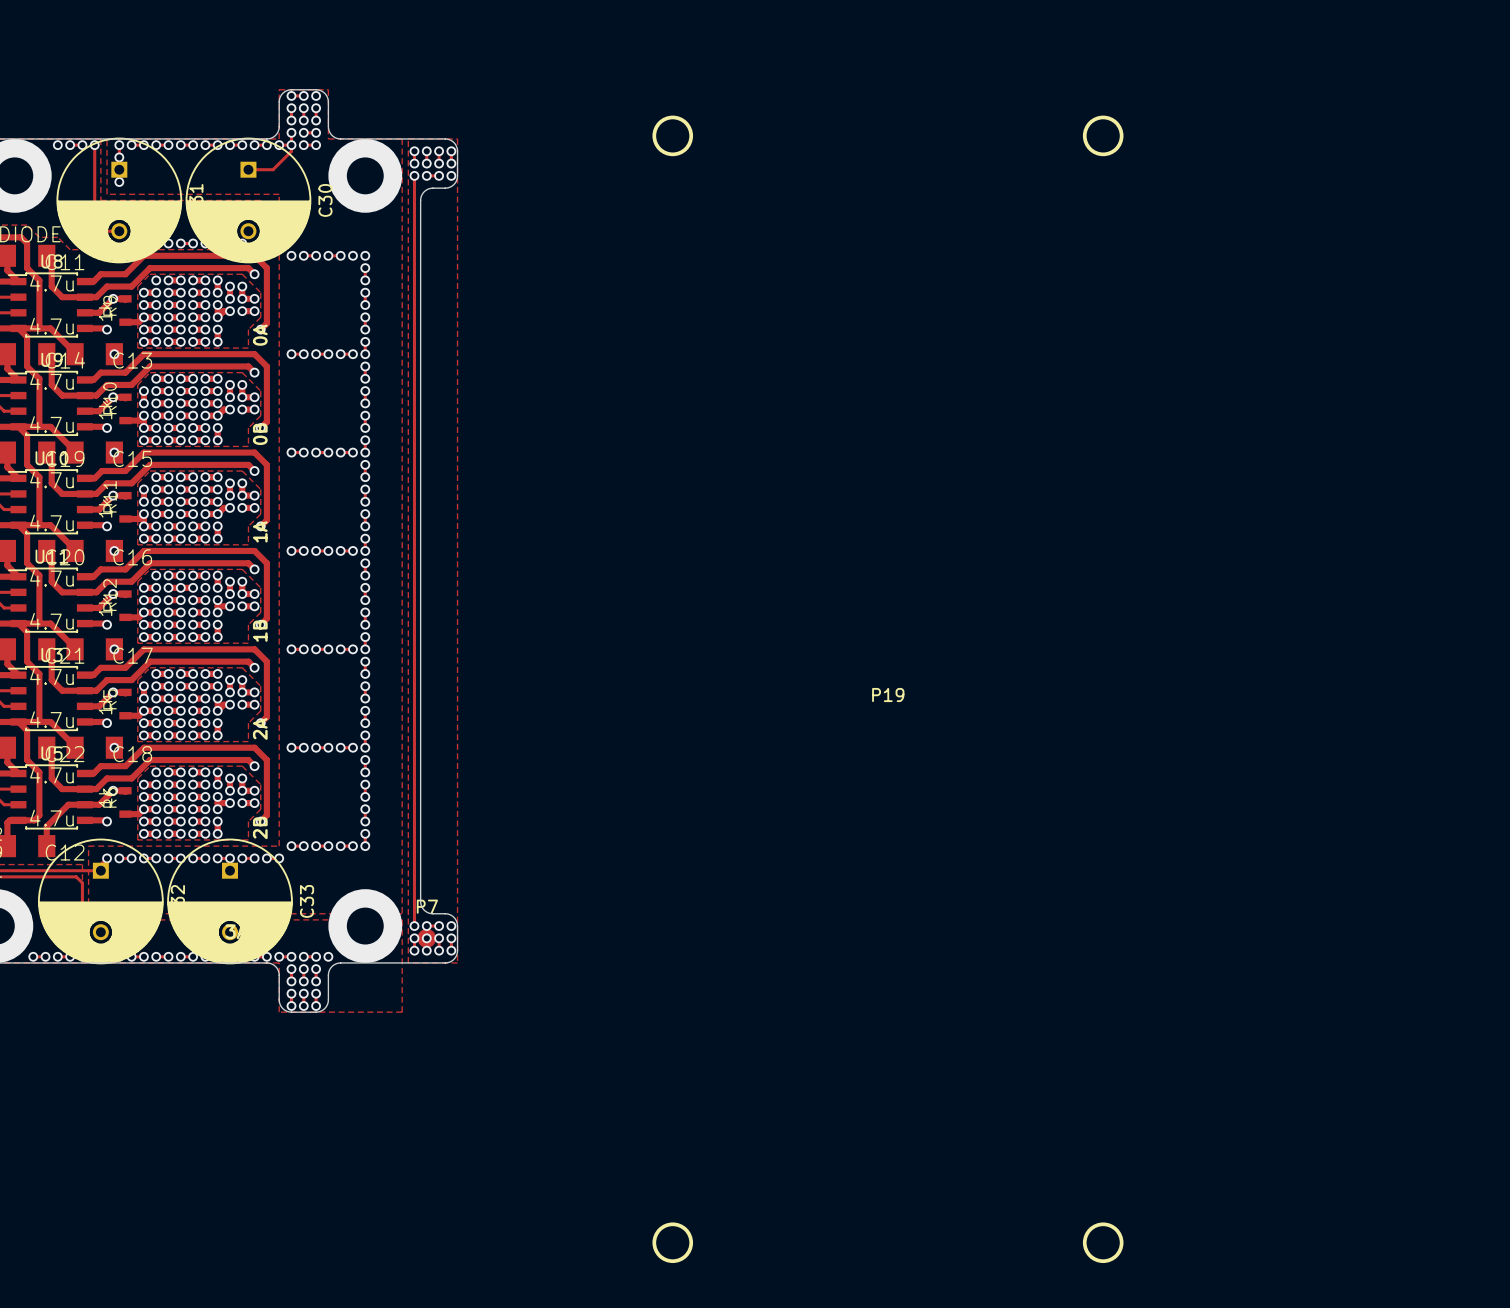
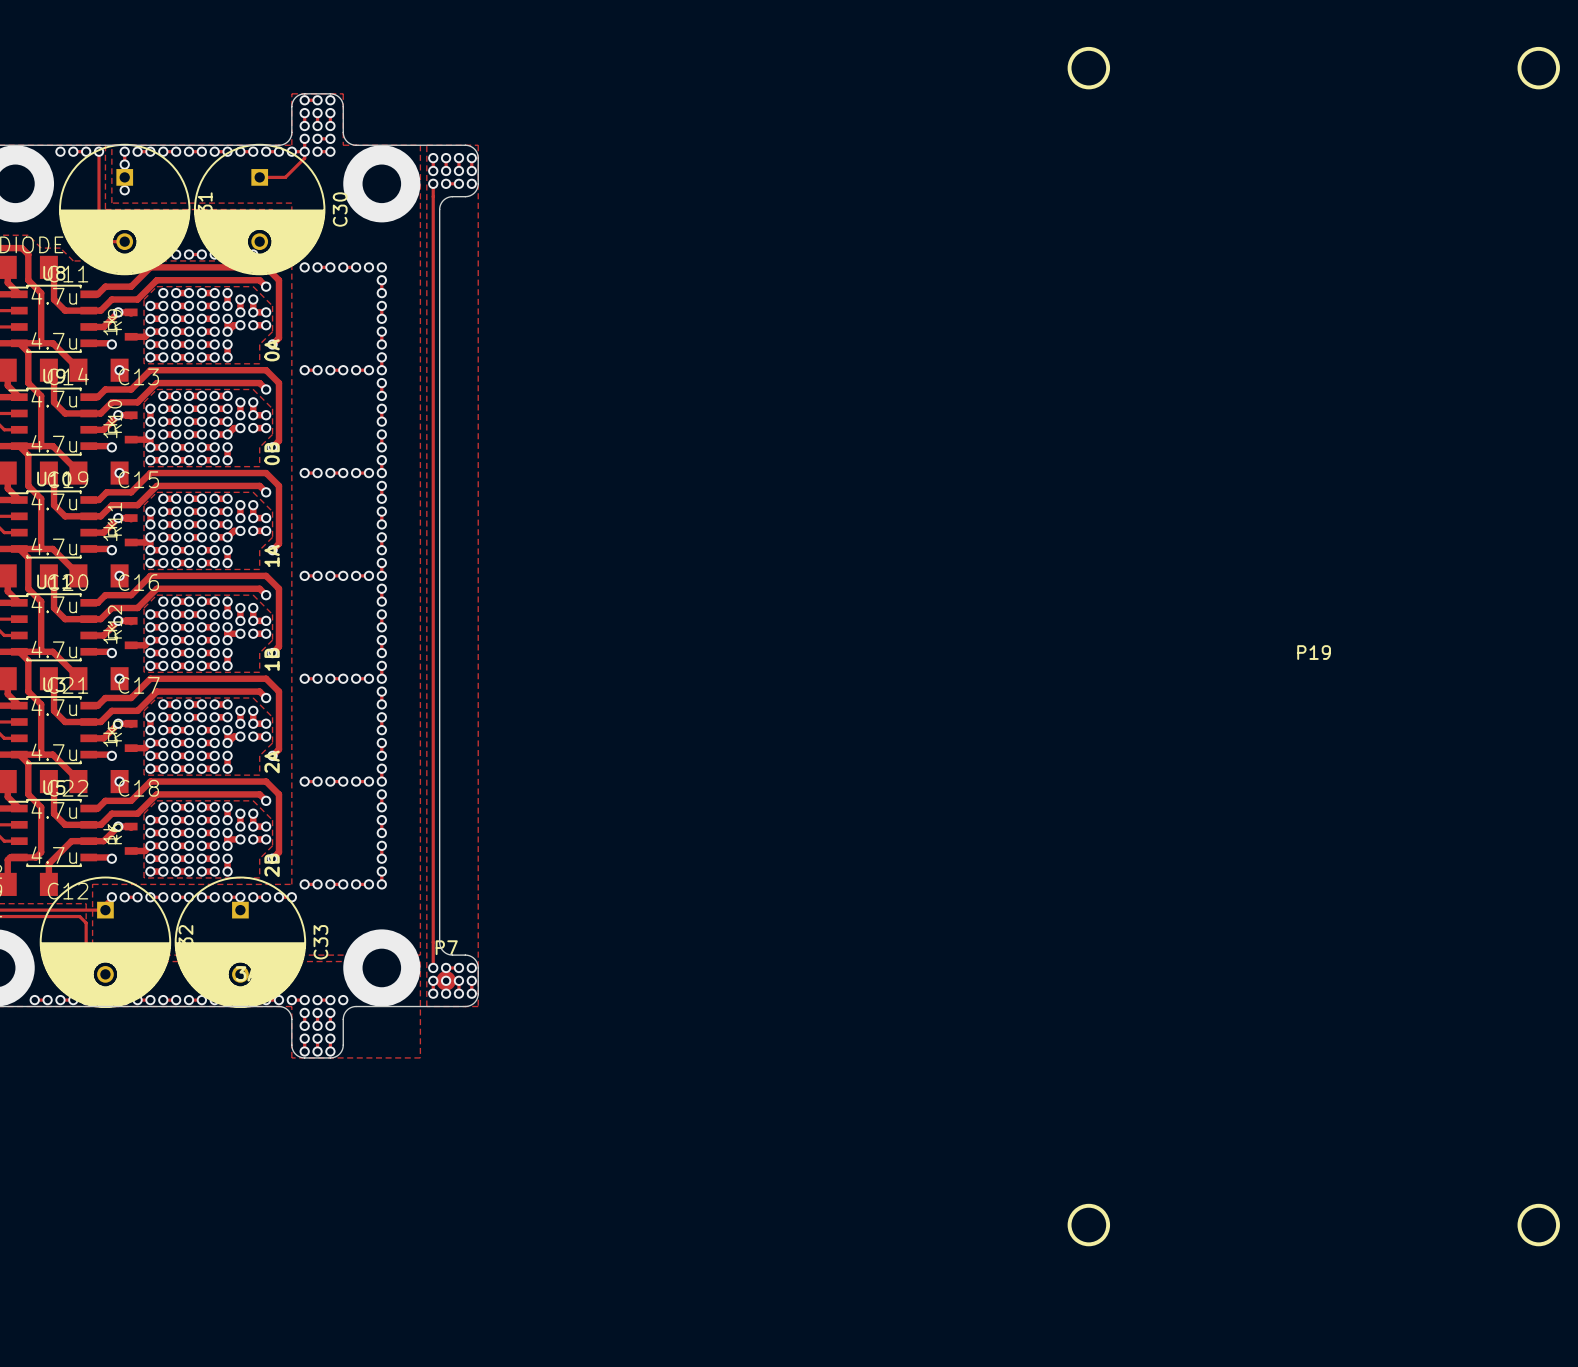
P19 position: (887, 689) -> (1313, 646)

